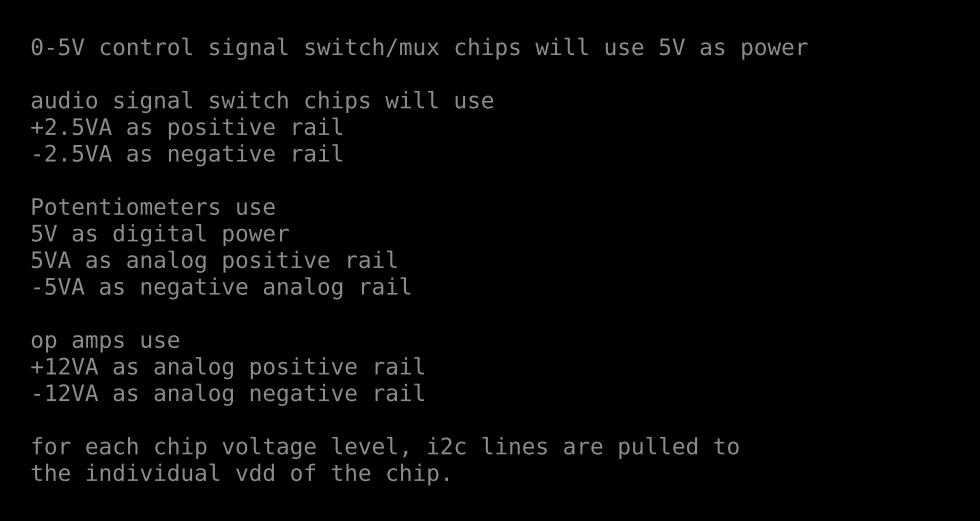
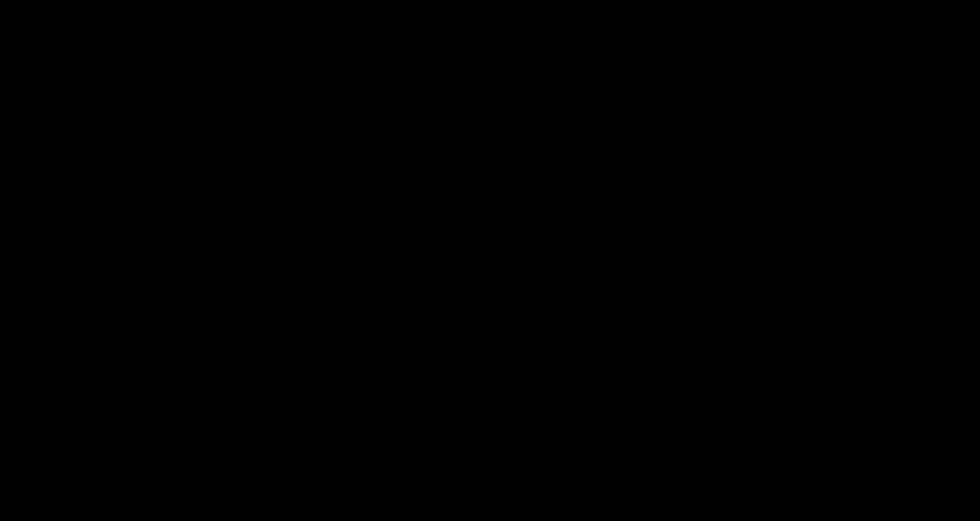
text: 0-5V control signal switch/mux chips will use 5V as power (419, 48) -> none
text: audio signal switch chips will use (262, 102) -> none
text: +2.5VA as positive rail (186, 128) -> none
text: -2.5VA as negative rail (188, 155) -> none
text: Potentiometers use (153, 206) -> none
text: 5V as digital power (160, 235) -> none
text: 5VA as analog positive rail (214, 261) -> none
text: -5VA as negative analog rail (222, 288) -> none
text: op amps use (105, 343) -> none
text: +12VA as analog positive rail (227, 368) -> none
text: -12VA as analog negative rail (229, 394) -> none
text: for each chip voltage level, i2c lines are pulled to (385, 448) -> none
text: the individual vdd of the chip. (239, 474) -> none

